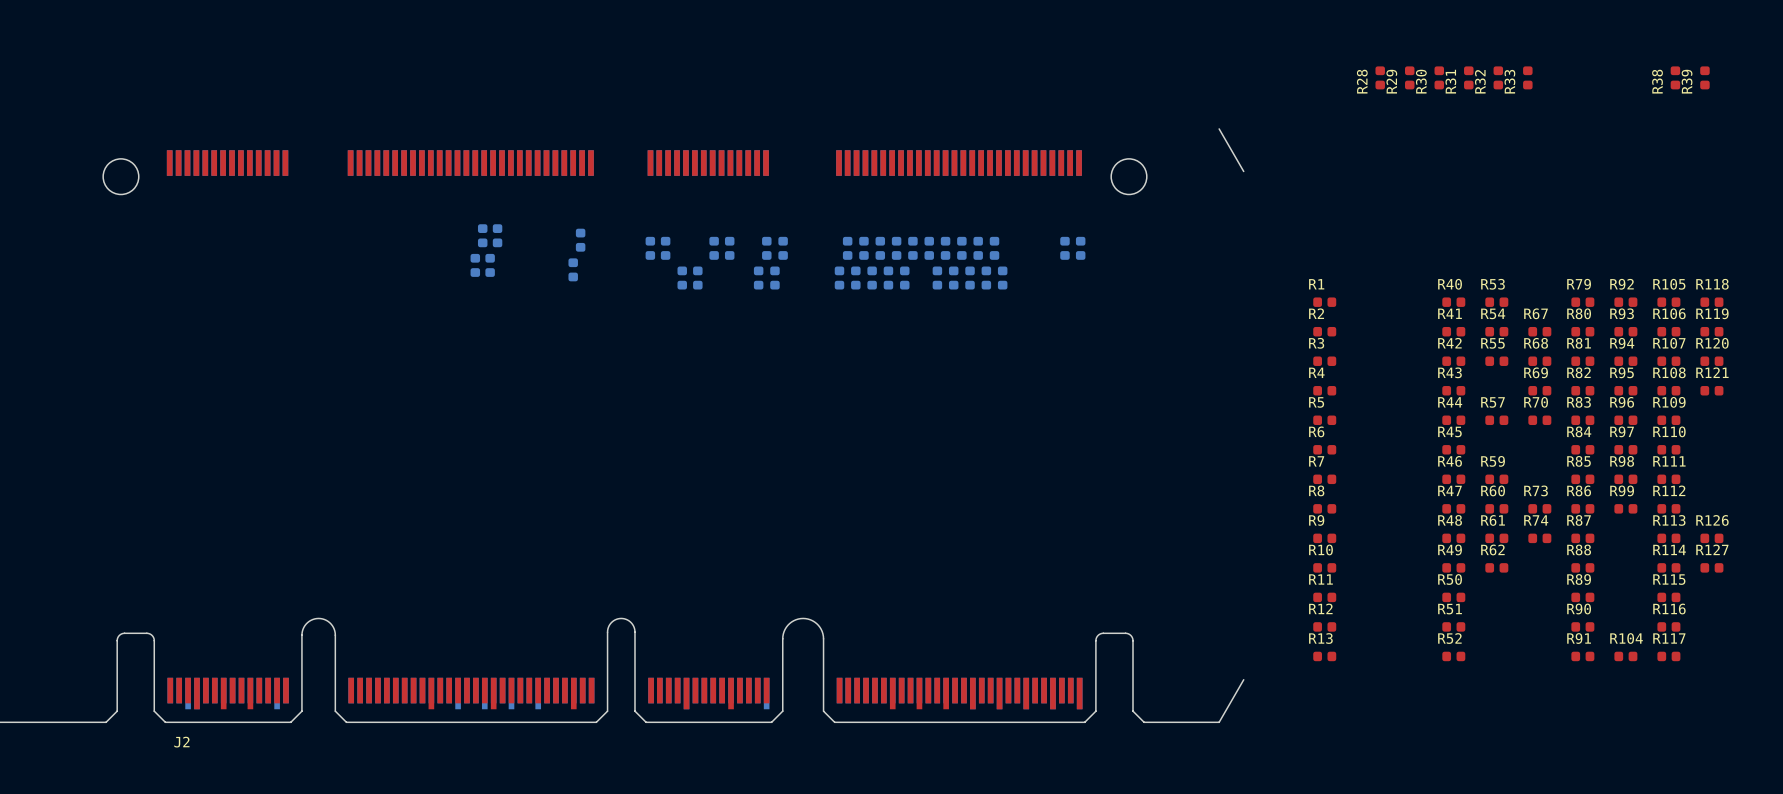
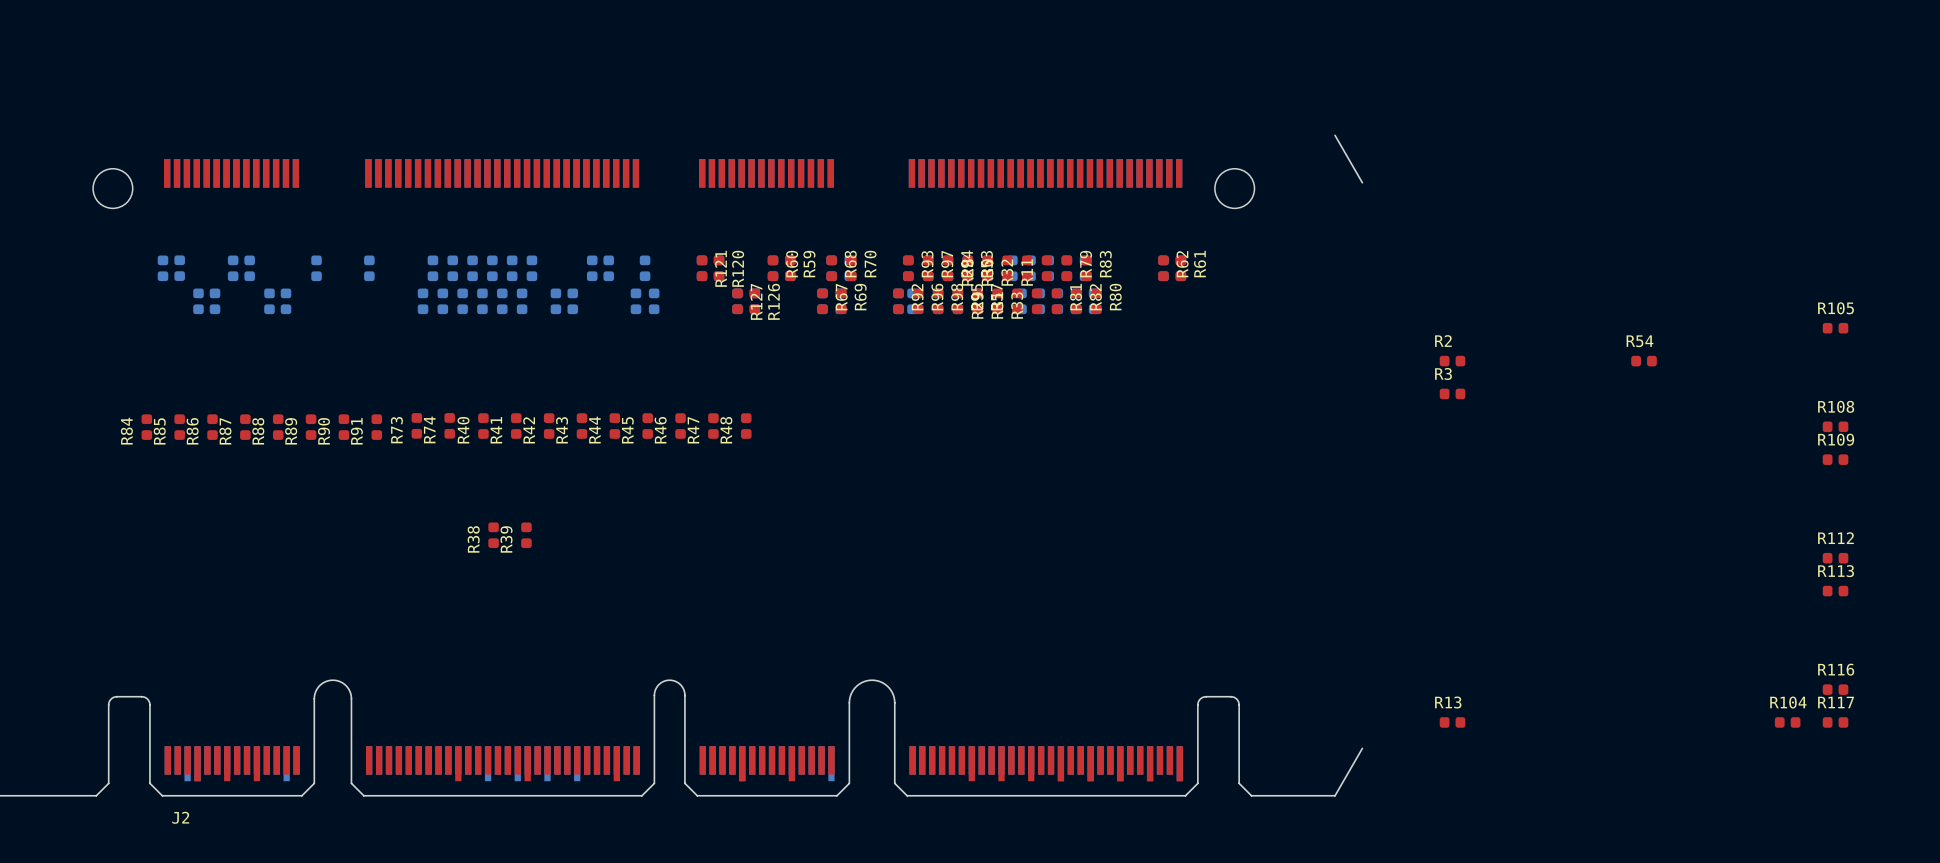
R28 position: (1380, 77) -> (987, 268)
R29 position: (1409, 77) -> (997, 301)
R30 position: (1439, 77) -> (1007, 268)
R31 position: (1468, 77) -> (1017, 301)
R32 position: (1498, 77) -> (1027, 268)
R33 position: (1527, 77) -> (1037, 301)
R38 position: (1675, 77) -> (493, 535)
R39 position: (1704, 77) -> (526, 535)
part: (482, 235) -> none
part: (497, 235) -> none
part: (580, 240) -> none
part: none -> (163, 268)
part: none -> (179, 268)
part: none -> (233, 268)
part: none -> (249, 268)
part: none -> (316, 268)
part: none -> (369, 268)
part: none -> (432, 268)
part: none -> (452, 268)
part: none -> (472, 268)
part: none -> (492, 268)
part: none -> (512, 268)
part: none -> (531, 268)
part: none -> (592, 268)
part: none -> (608, 268)
part: none -> (645, 268)
part: (847, 248) -> none
part: (863, 248) -> none
part: (880, 248) -> none
part: (896, 248) -> none
part: (912, 248) -> none
part: (475, 265) -> none
part: (490, 265) -> none
part: (573, 269) -> none
part: none -> (198, 301)
part: none -> (215, 301)
part: none -> (269, 301)
part: none -> (285, 301)
part: none -> (423, 301)
part: none -> (442, 301)
part: none -> (462, 301)
part: none -> (482, 301)
part: none -> (502, 301)
part: none -> (522, 301)
part: none -> (555, 301)
part: none -> (572, 301)
part: none -> (635, 301)
part: none -> (654, 301)
part: (855, 278) -> none
part: (872, 278) -> none
part: (888, 278) -> none
part: (904, 278) -> none
R1: (1324, 302) -> none
R40 rotation: 0° (1453, 302) -> 90° clockwise (483, 426)
R40 position: (1453, 302) -> (483, 426)
R53 rotation: 0° (1496, 302) -> 90° clockwise (967, 268)
R53 position: (1496, 302) -> (967, 268)
R79 rotation: 0° (1582, 302) -> 90° clockwise (1066, 268)
R79 position: (1582, 302) -> (1066, 268)
R92 rotation: 0° (1625, 302) -> 90° clockwise (898, 301)
R92 position: (1625, 302) -> (898, 301)
R118: (1711, 302) -> none
R41 rotation: 0° (1453, 331) -> 90° clockwise (516, 426)
R41 position: (1453, 331) -> (516, 426)
R67 rotation: 0° (1539, 331) -> 90° clockwise (822, 301)
R67 position: (1539, 331) -> (822, 301)
R80 rotation: 0° (1582, 331) -> 90° clockwise (1096, 301)
R80 position: (1582, 331) -> (1096, 301)
R93 rotation: 0° (1625, 331) -> 90° clockwise (908, 268)
R93 position: (1625, 331) -> (908, 268)
R106: (1668, 331) -> none
R119: (1711, 331) -> none
R42 rotation: 0° (1453, 361) -> 90° clockwise (549, 426)
R42 position: (1453, 361) -> (549, 426)
R55: (1496, 361) -> none
R68 rotation: 0° (1539, 361) -> 90° clockwise (831, 268)
R68 position: (1539, 361) -> (831, 268)
R81 rotation: 0° (1582, 361) -> 90° clockwise (1056, 301)
R81 position: (1582, 361) -> (1056, 301)
R94 rotation: 0° (1625, 361) -> 90° clockwise (948, 268)
R94 position: (1625, 361) -> (948, 268)
R107: (1668, 361) -> none
R120 rotation: 0° (1711, 361) -> 90° clockwise (719, 268)
R120 position: (1711, 361) -> (719, 268)
R4: (1324, 390) -> none
R43 rotation: 0° (1453, 390) -> 90° clockwise (582, 426)
R43 position: (1453, 390) -> (582, 426)
R69 rotation: 0° (1539, 390) -> 90° clockwise (841, 301)
R69 position: (1539, 390) -> (841, 301)
R82 rotation: 0° (1582, 390) -> 90° clockwise (1076, 301)
R82 position: (1582, 390) -> (1076, 301)
R95 rotation: 0° (1625, 390) -> 90° clockwise (957, 301)
R95 position: (1625, 390) -> (957, 301)
R121 rotation: 0° (1711, 390) -> 90° clockwise (702, 268)
R121 position: (1711, 390) -> (702, 268)
R5: (1324, 420) -> none
R44 rotation: 0° (1453, 420) -> 90° clockwise (614, 426)
R44 position: (1453, 420) -> (614, 426)
R57 rotation: 0° (1496, 420) -> 90° clockwise (977, 301)
R57 position: (1496, 420) -> (977, 301)
R70 rotation: 0° (1539, 420) -> 90° clockwise (851, 268)
R70 position: (1539, 420) -> (851, 268)
R83 rotation: 0° (1582, 420) -> 90° clockwise (1086, 268)
R83 position: (1582, 420) -> (1086, 268)
R96 rotation: 0° (1625, 420) -> 90° clockwise (918, 301)
R96 position: (1625, 420) -> (918, 301)
R6: (1324, 449) -> none
R45 rotation: 0° (1453, 449) -> 90° clockwise (647, 426)
R45 position: (1453, 449) -> (647, 426)
R84 rotation: 0° (1582, 449) -> 90° clockwise (146, 427)
R84 position: (1582, 449) -> (146, 427)
R97 rotation: 0° (1625, 449) -> 90° clockwise (928, 268)
R97 position: (1625, 449) -> (928, 268)
R110: (1668, 449) -> none
R7: (1324, 479) -> none
R46 rotation: 0° (1453, 479) -> 90° clockwise (680, 426)
R46 position: (1453, 479) -> (680, 426)
R59 rotation: 0° (1496, 479) -> 90° clockwise (790, 268)
R59 position: (1496, 479) -> (790, 268)
R85 rotation: 0° (1582, 479) -> 90° clockwise (179, 427)
R85 position: (1582, 479) -> (179, 427)
R98 rotation: 0° (1625, 479) -> 90° clockwise (938, 301)
R98 position: (1625, 479) -> (938, 301)
R111: (1668, 479) -> none
R8: (1324, 508) -> none
R47 rotation: 0° (1453, 508) -> 90° clockwise (713, 426)
R47 position: (1453, 508) -> (713, 426)
R60 rotation: 0° (1496, 508) -> 90° clockwise (773, 268)
R60 position: (1496, 508) -> (773, 268)
R73 rotation: 0° (1539, 508) -> 90° clockwise (416, 425)
R73 position: (1539, 508) -> (416, 425)
R86 rotation: 0° (1582, 508) -> 90° clockwise (212, 427)
R86 position: (1582, 508) -> (212, 427)
R99: (1625, 508) -> none
R9: (1324, 538) -> none
R48 rotation: 0° (1453, 538) -> 90° clockwise (746, 426)
R48 position: (1453, 538) -> (746, 426)
R61 rotation: 0° (1496, 538) -> 90° clockwise (1180, 268)
R61 position: (1496, 538) -> (1180, 268)
R74 rotation: 0° (1539, 538) -> 90° clockwise (449, 425)
R74 position: (1539, 538) -> (449, 425)
R87 rotation: 0° (1582, 538) -> 90° clockwise (245, 427)
R87 position: (1582, 538) -> (245, 427)
R126 rotation: 0° (1711, 538) -> 90° clockwise (754, 301)
R126 position: (1711, 538) -> (754, 301)
R10: (1324, 567) -> none
R49: (1453, 567) -> none
R62 rotation: 0° (1496, 567) -> 90° clockwise (1163, 268)
R62 position: (1496, 567) -> (1163, 268)
R88 rotation: 0° (1582, 567) -> 90° clockwise (278, 427)
R88 position: (1582, 567) -> (278, 427)
R114: (1668, 567) -> none
R127 rotation: 0° (1711, 567) -> 90° clockwise (737, 301)
R127 position: (1711, 567) -> (737, 301)
R11 rotation: 0° (1324, 597) -> 90° clockwise (1047, 268)
R11 position: (1324, 597) -> (1047, 268)
R50: (1453, 597) -> none
R89 rotation: 0° (1582, 597) -> 90° clockwise (311, 427)
R89 position: (1582, 597) -> (311, 427)
R115: (1668, 597) -> none
R12: (1324, 626) -> none
R51: (1453, 626) -> none
R90 rotation: 0° (1582, 626) -> 90° clockwise (343, 427)
R90 position: (1582, 626) -> (343, 427)
R52: (1453, 656) -> none
R91 rotation: 0° (1582, 656) -> 90° clockwise (376, 427)
R91 position: (1582, 656) -> (376, 427)

